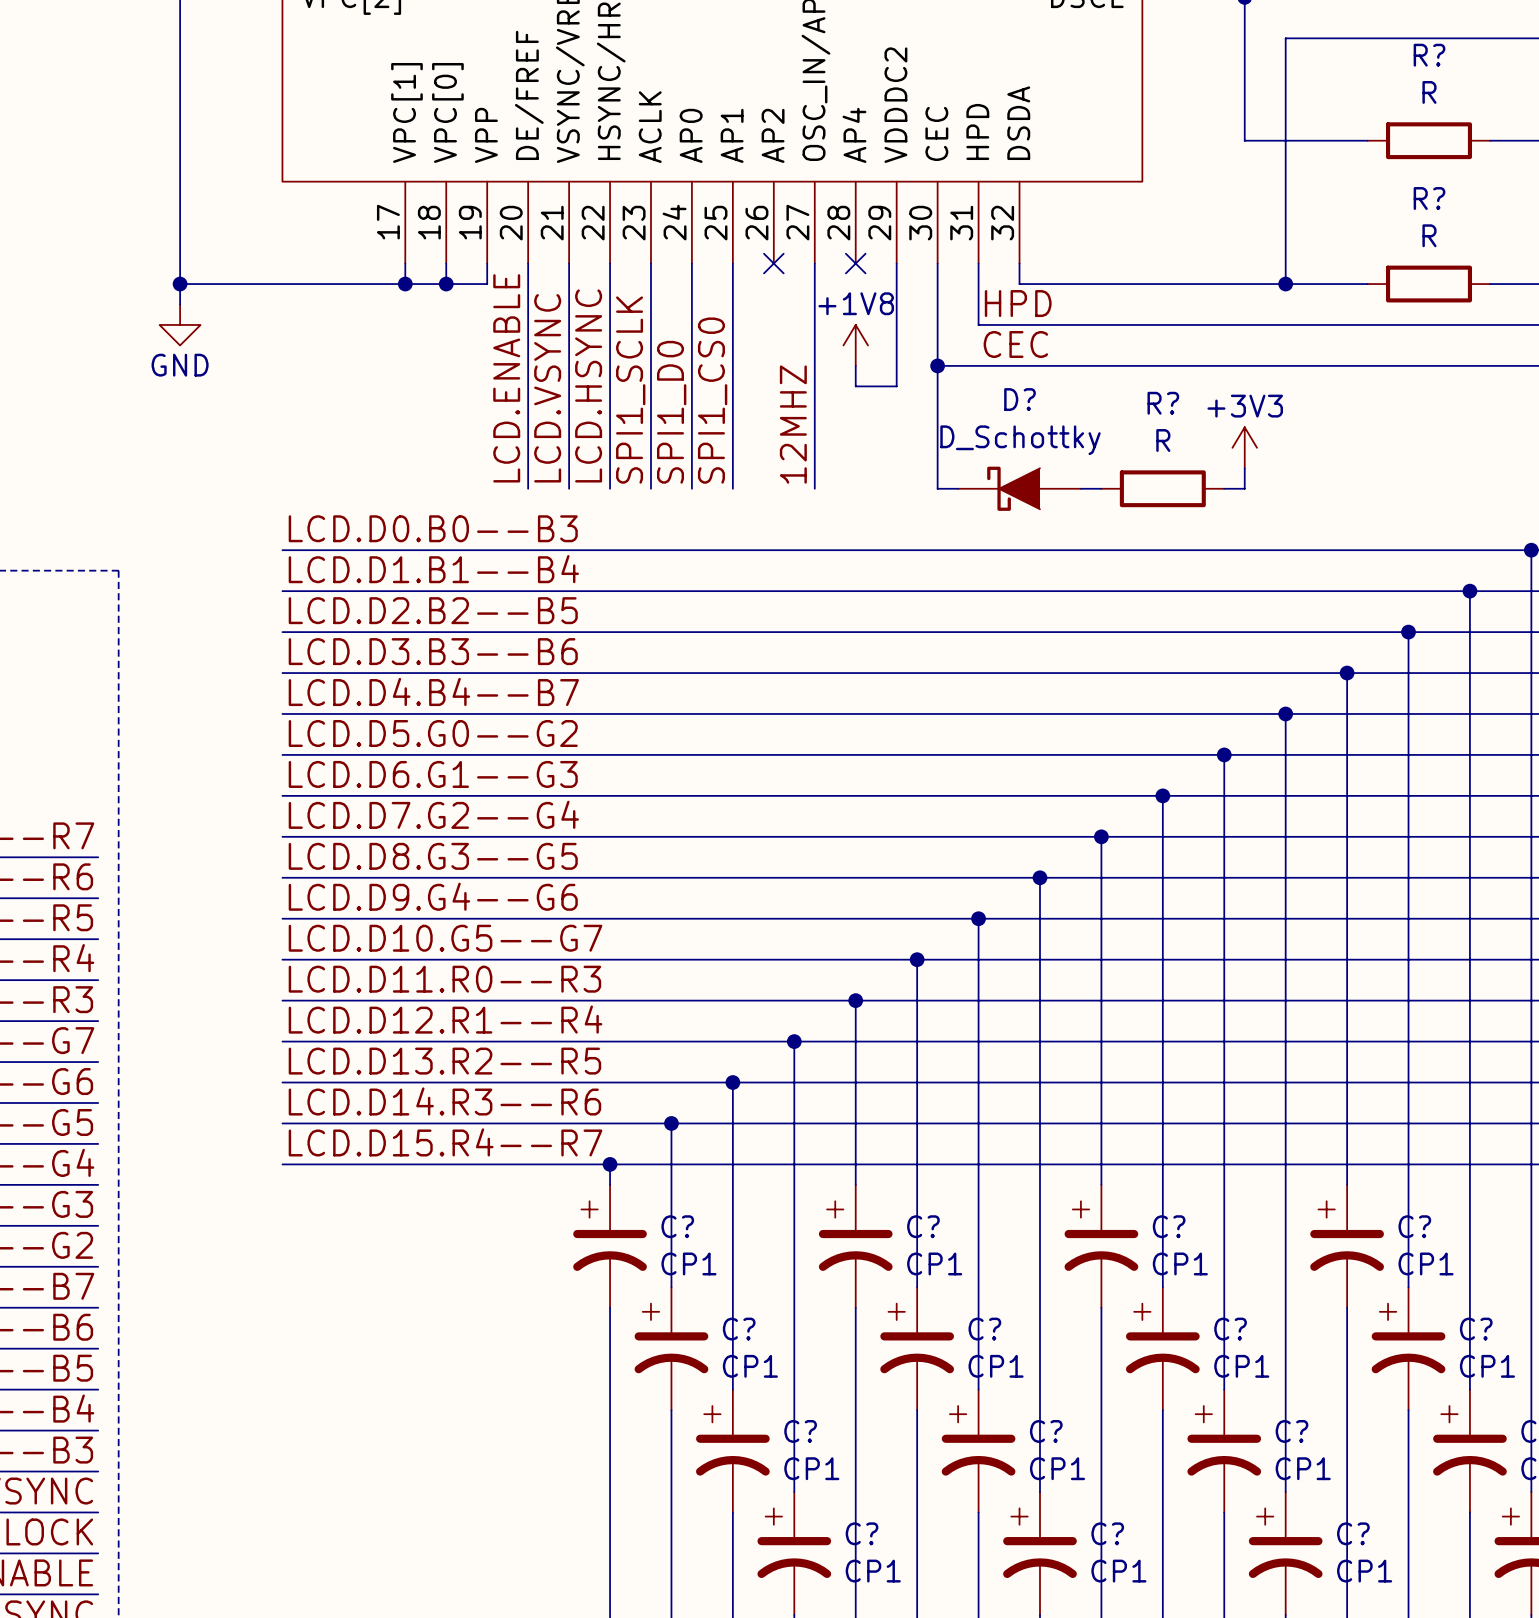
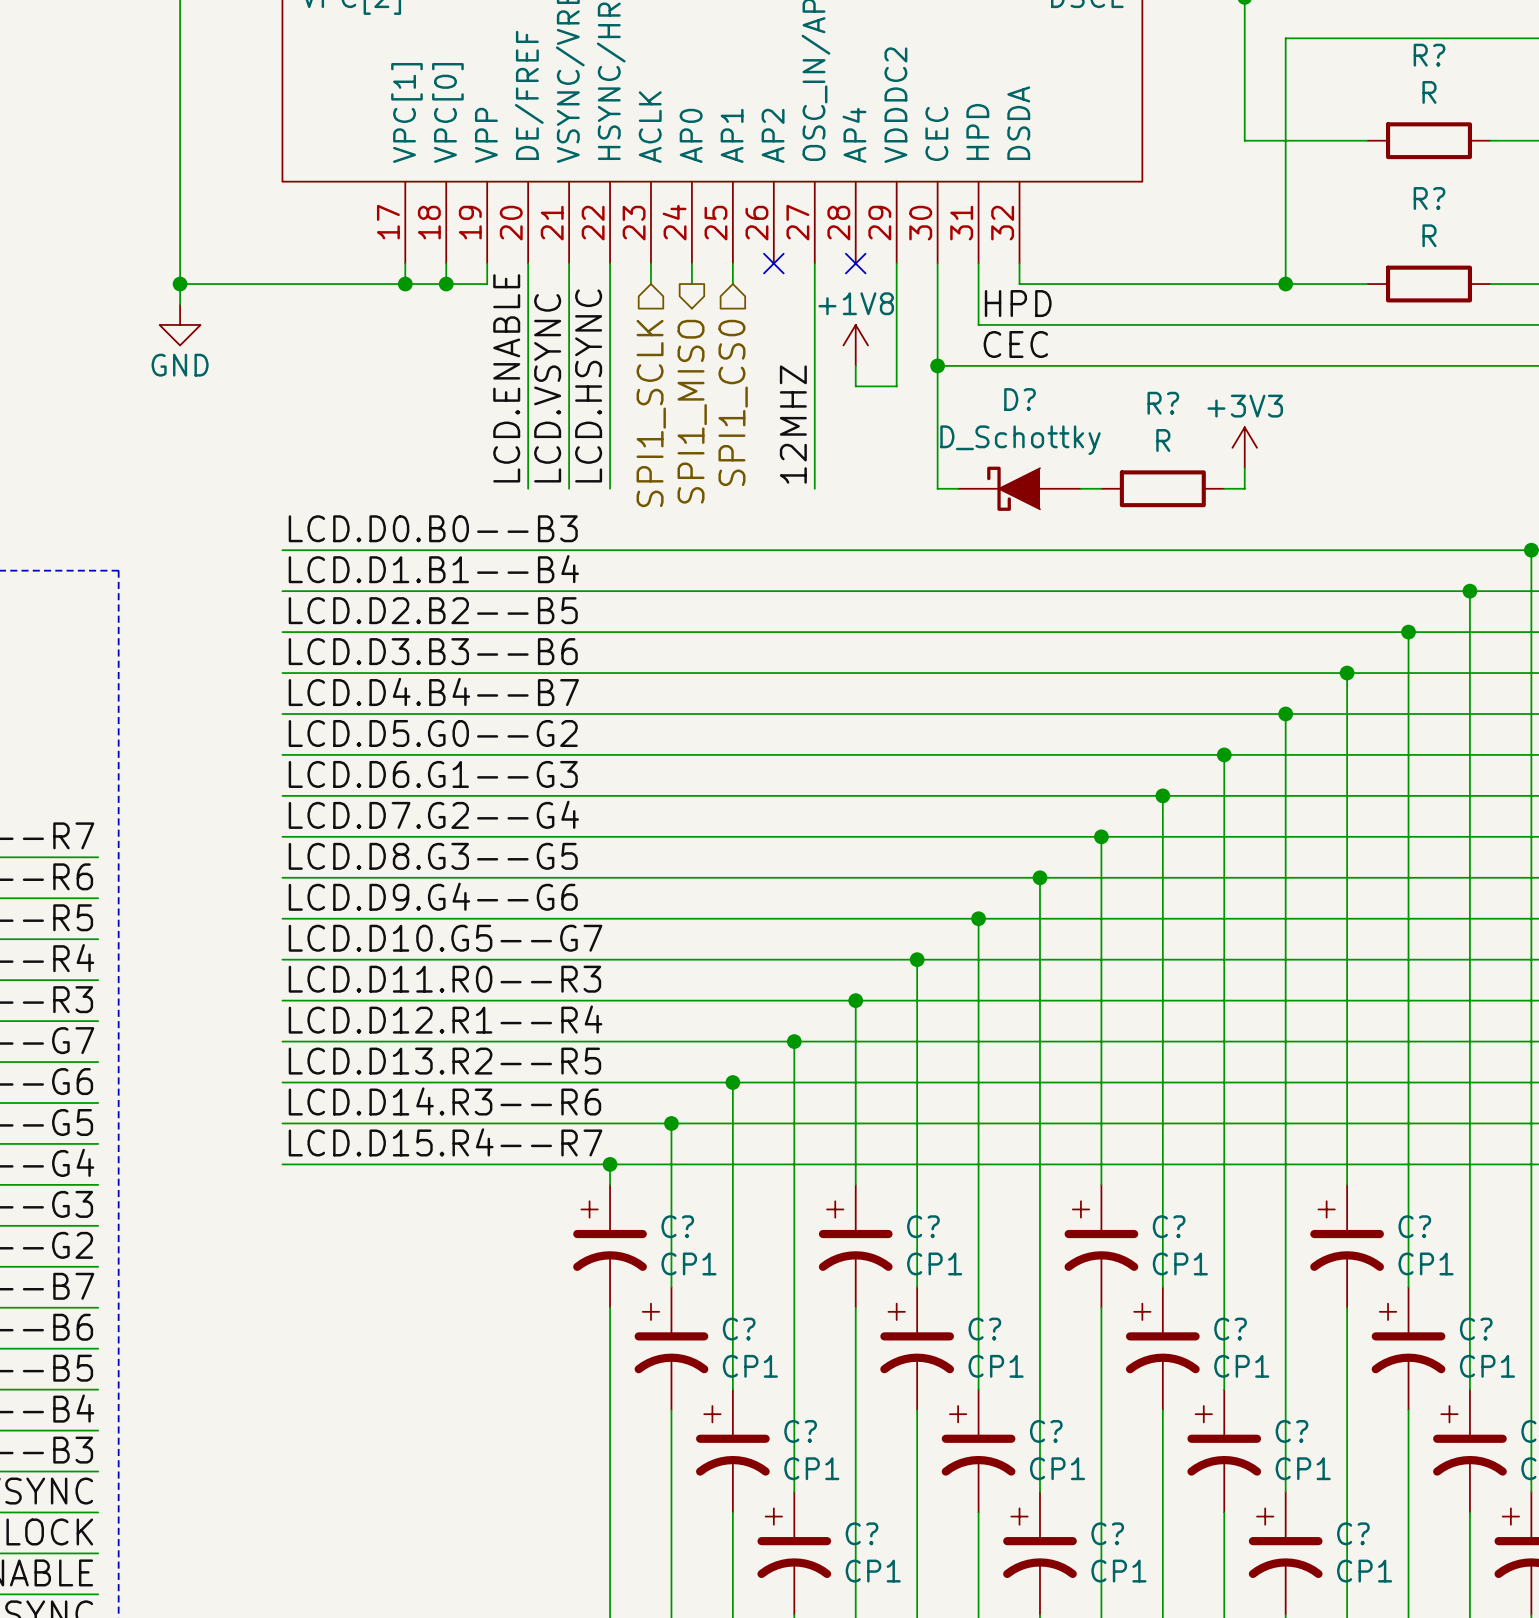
wire: (650, 284) (650, 488) -> none
wire: (691, 284) (691, 488) -> none
wire: (732, 284) (732, 488) -> none
label: SPI1_SCLK (630, 390) -> none
label: SPI1_CS0 (712, 400) -> none
hierarchical label: none -> SPI1_CS0 (733, 402)
hierarchical label: none -> SPI1_MISO (692, 411)
label: SPI1_D0 (671, 412) -> none
hierarchical label: none -> SPI1_SCLK (651, 413)

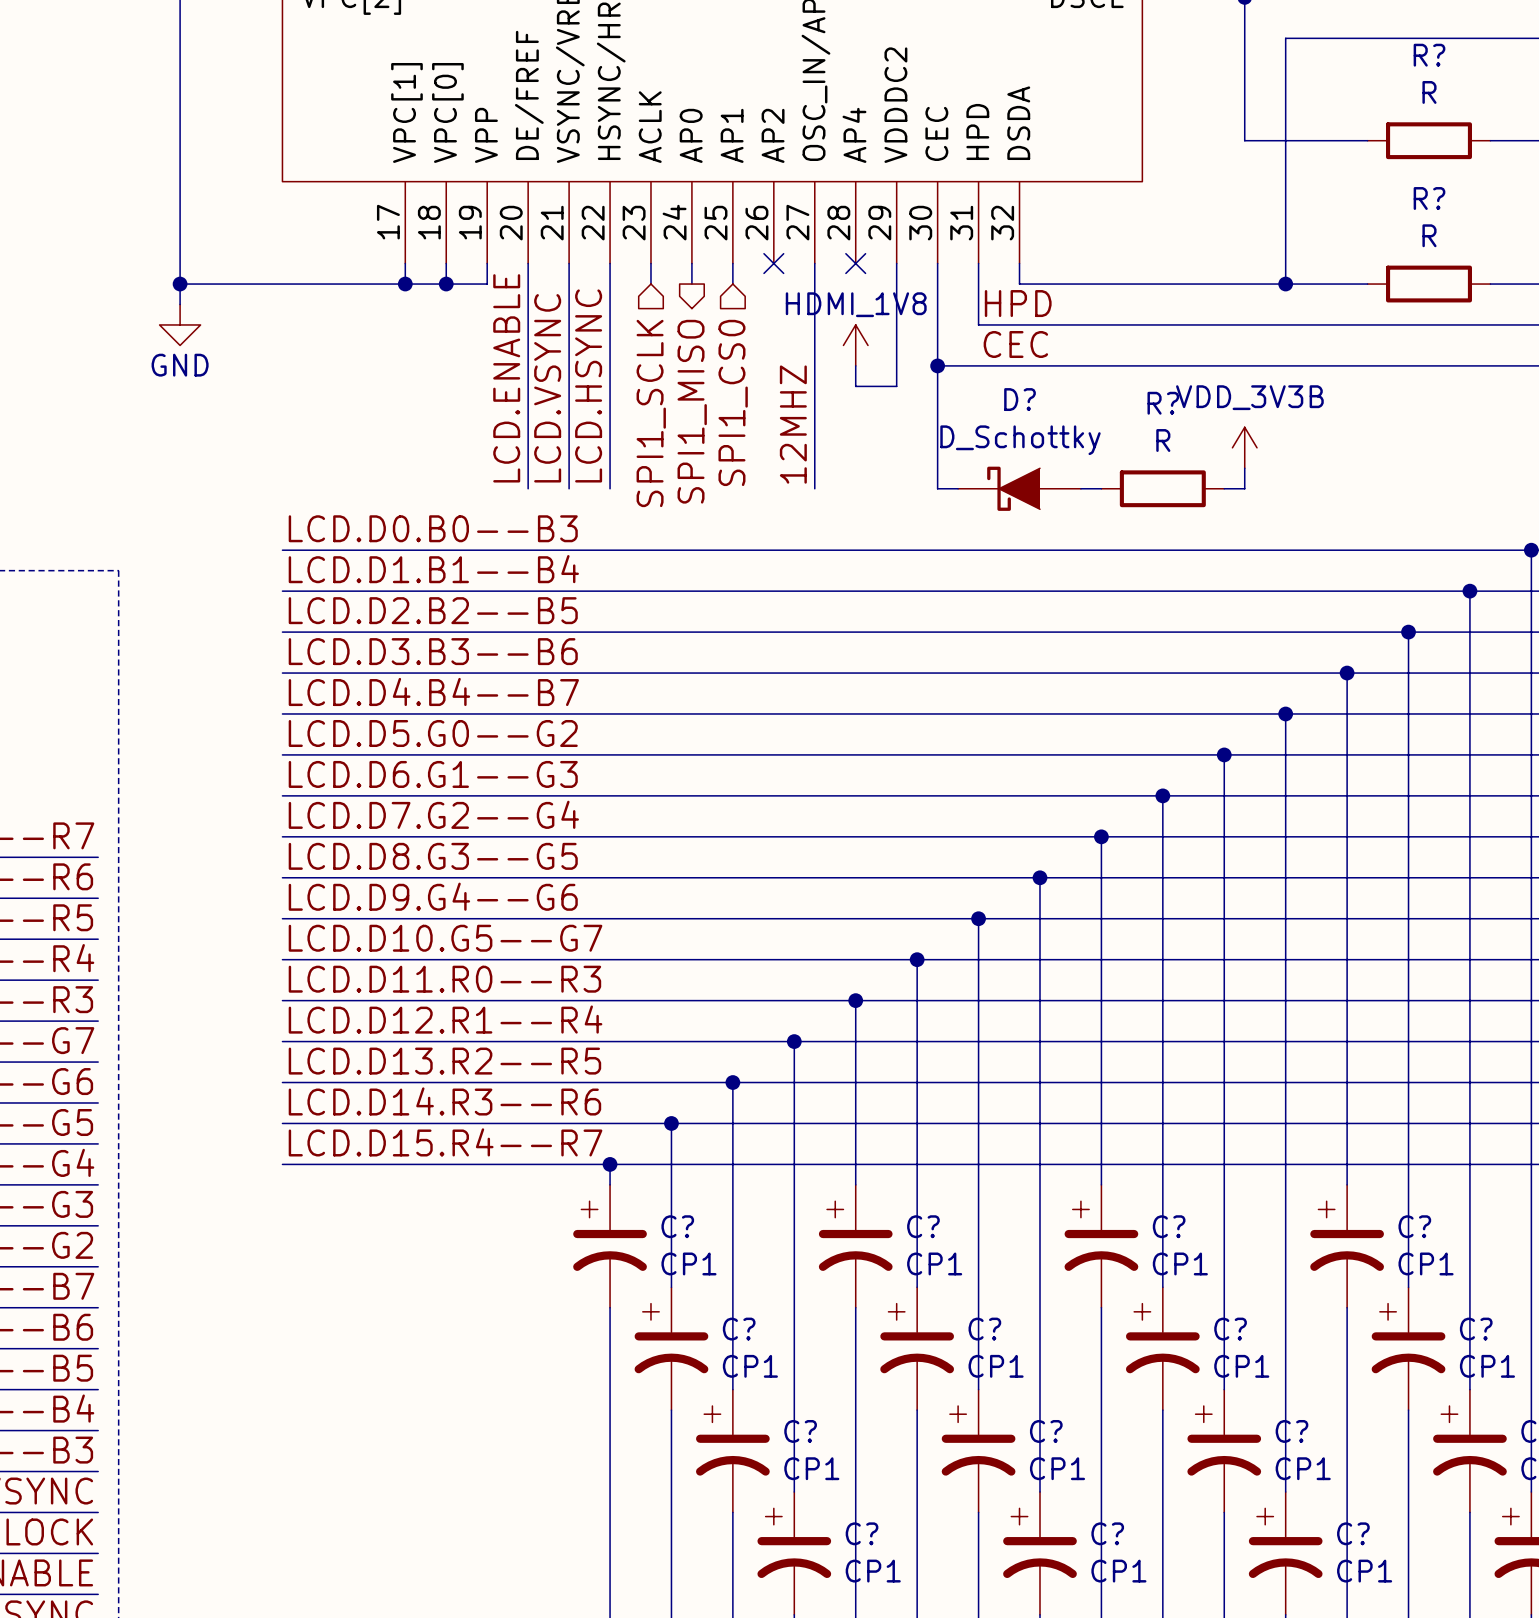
power symbol: +1V8 (855, 345) -> HDMI_1V8 (855, 345)
power symbol: +3V3 (1244, 447) -> VDD_3V3B (1244, 447)

